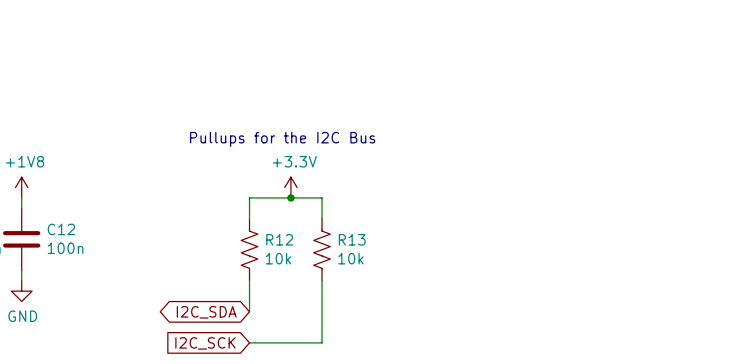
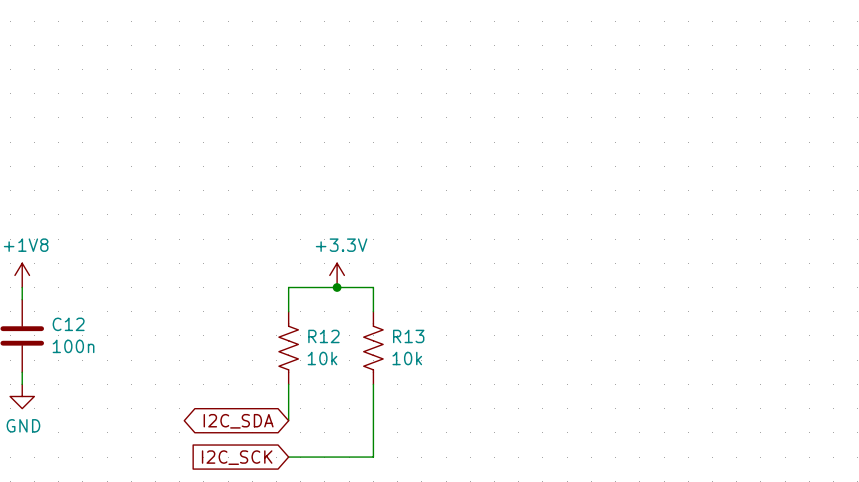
text: Pullups for the I2C Bus (282, 139) -> none

